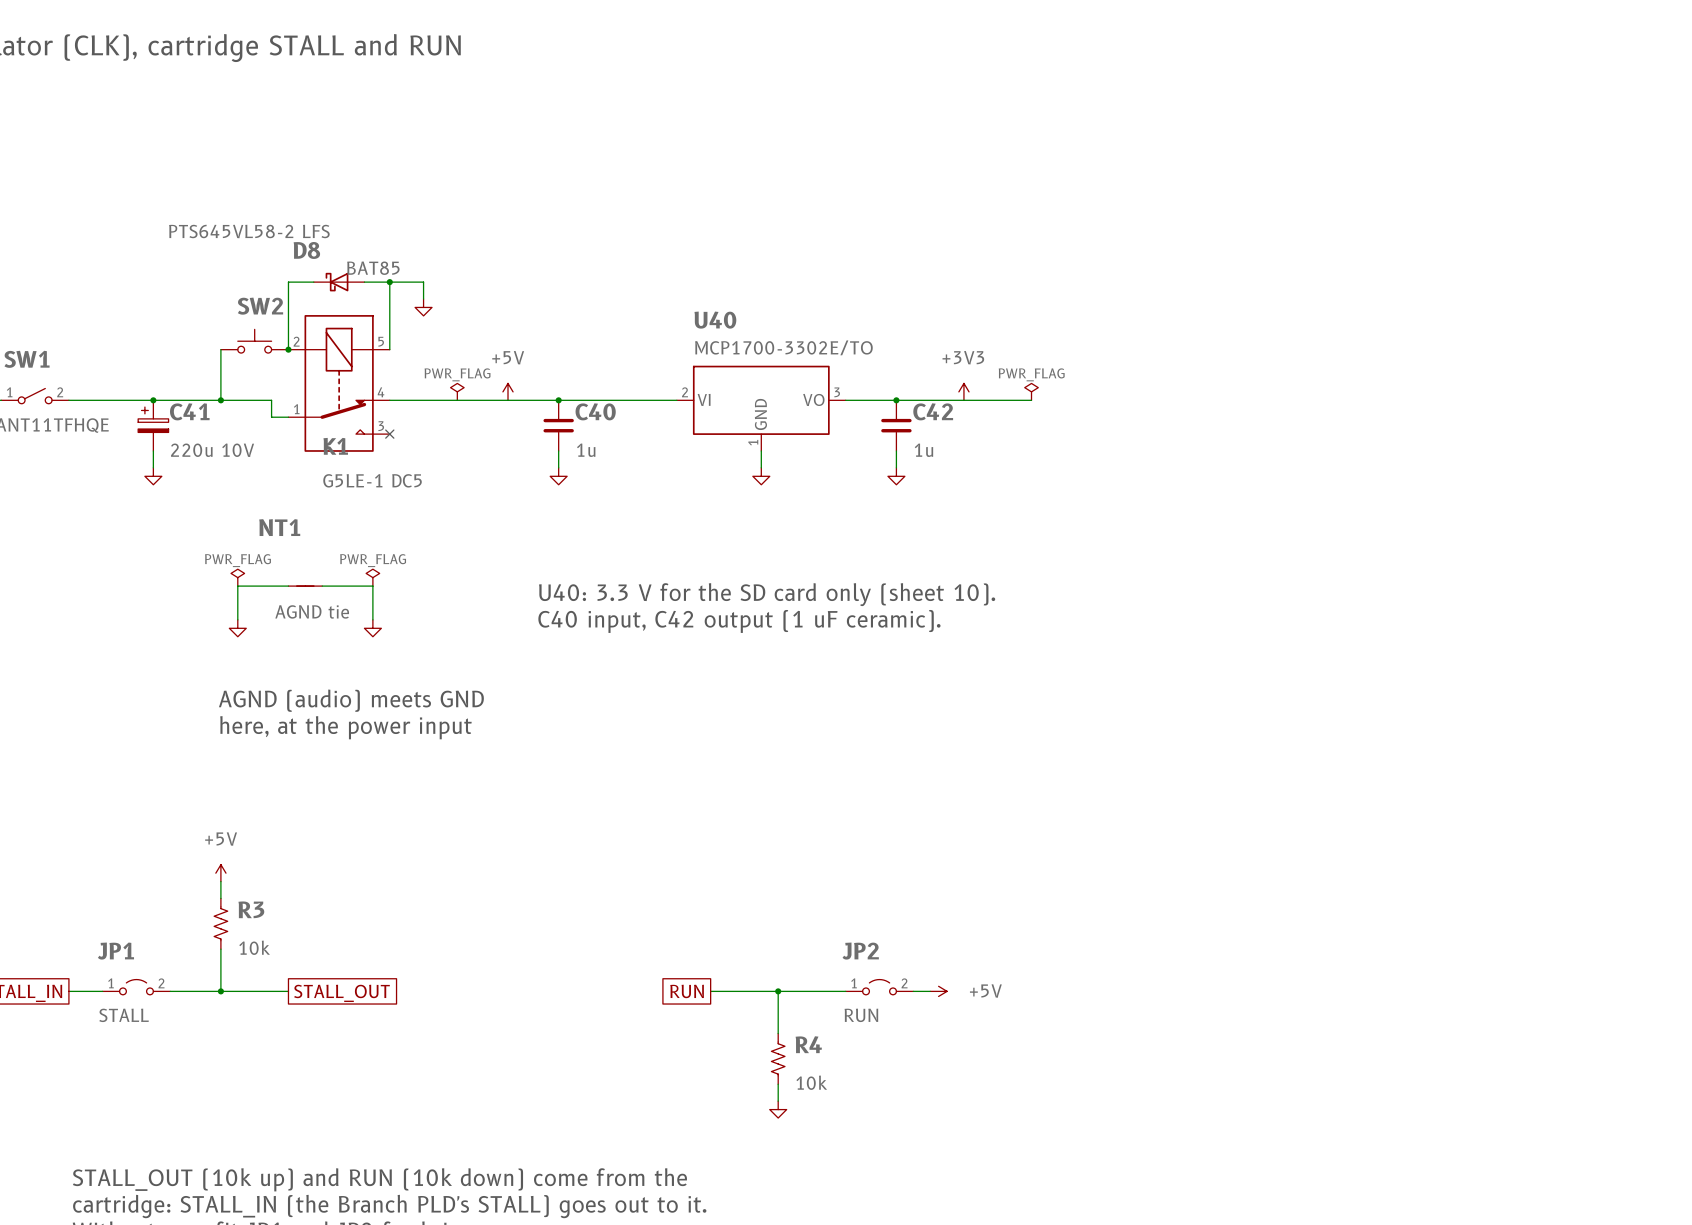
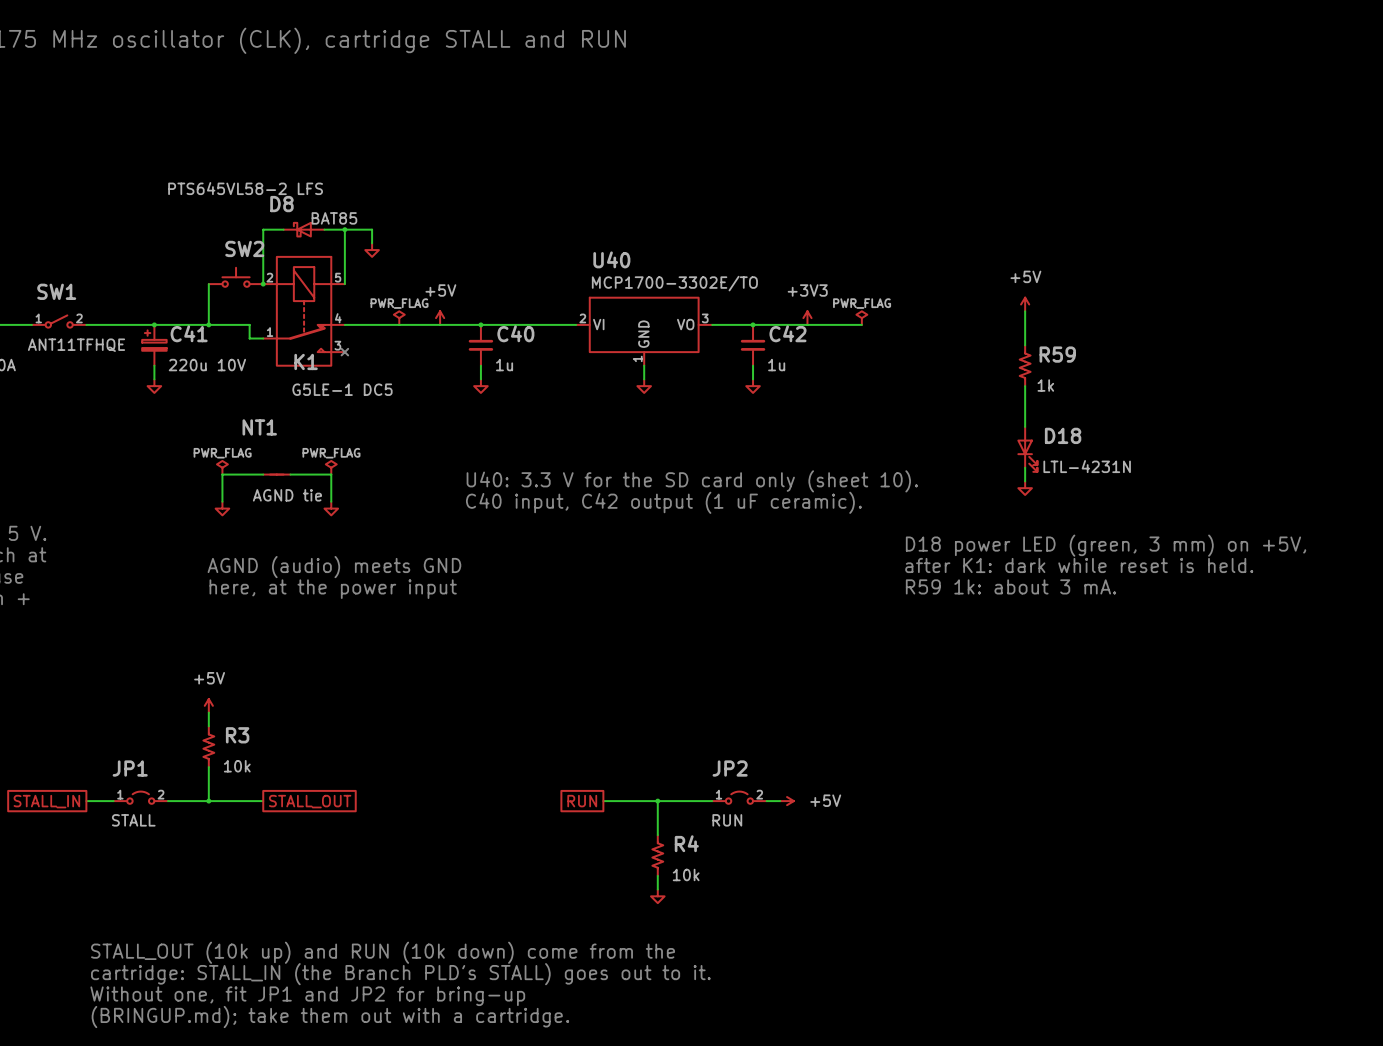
power symbol: none -> +5V (1025, 304)
wire: none -> (1025, 311) (1025, 345)
R59: none -> 1k (1025, 365)
wire: none -> (1025, 386) (1025, 426)
D18: none -> LTL-4231N (1027, 449)
wire: none -> (1025, 467) (1025, 481)
power symbol: none -> (1025, 488)
text: none -> D18 power LED (green, 3 mm) on +5V, (1106, 545)
text: none -> after K1: dark while reset is held. (1079, 565)
text: none -> R59 1k: about 3 mA. (1011, 586)

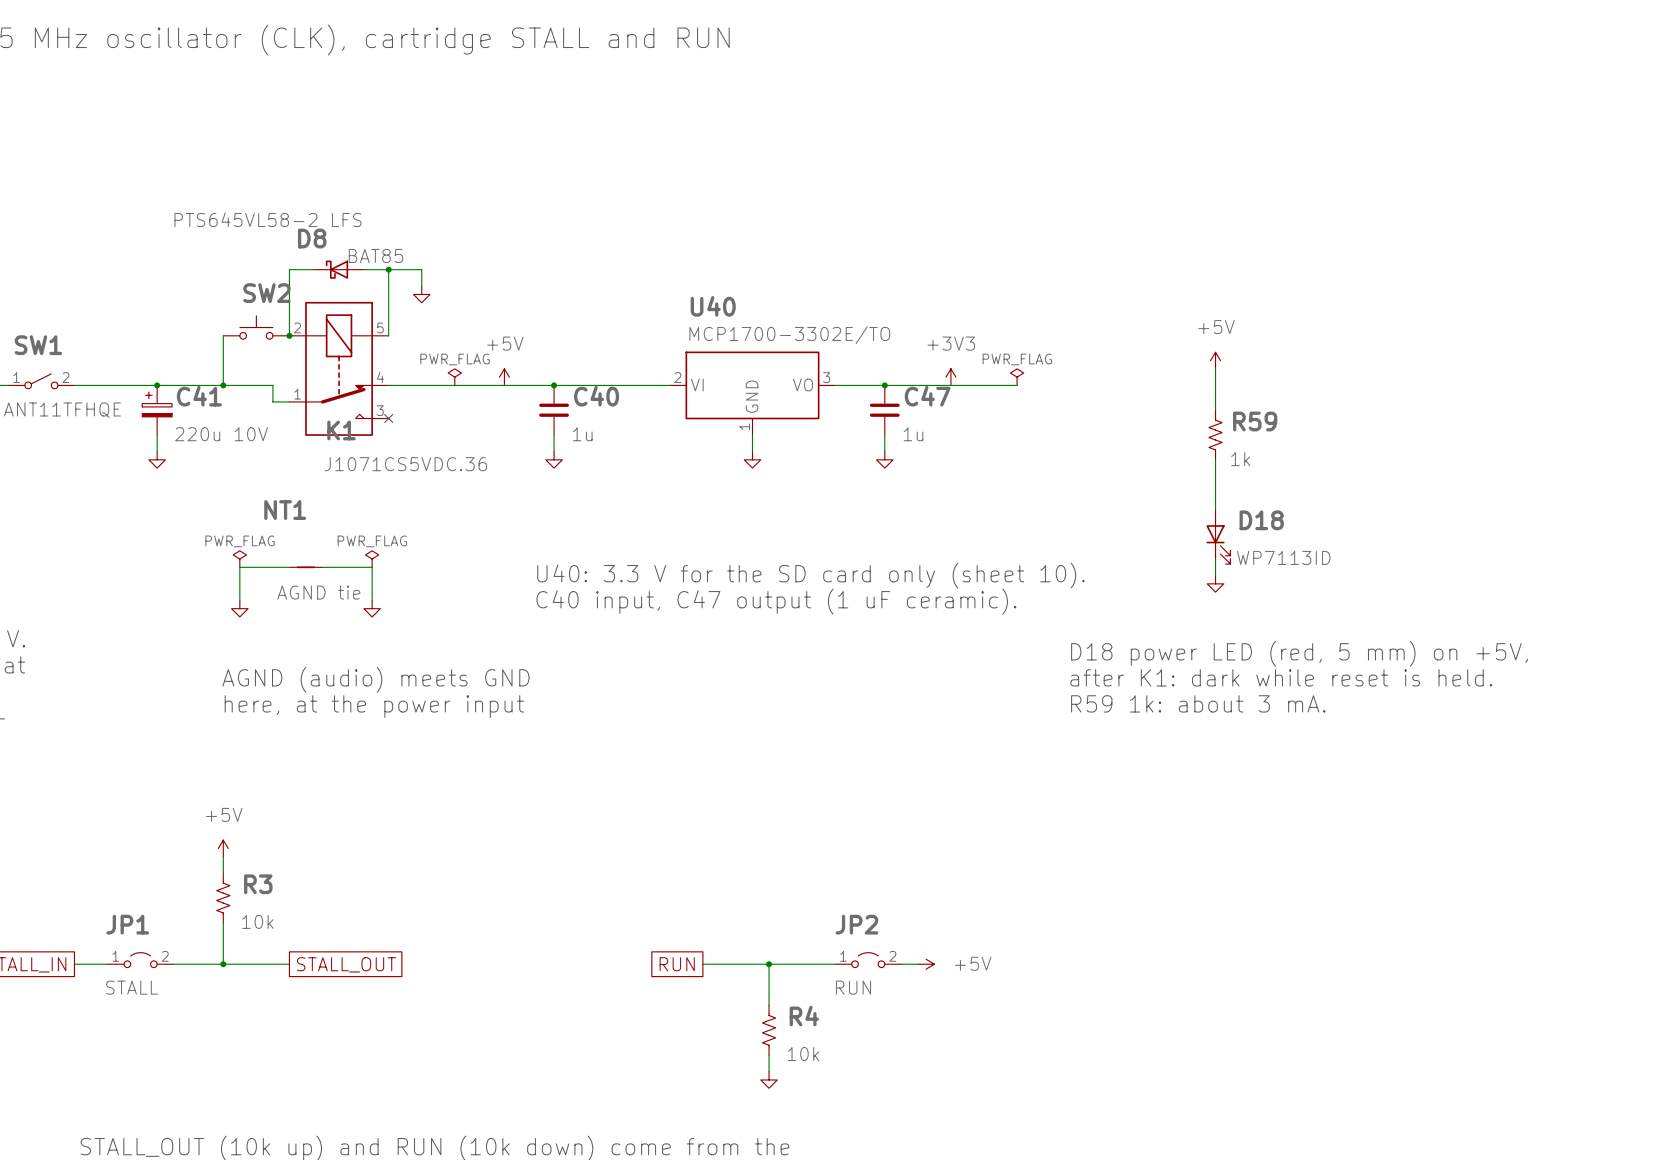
C42 name: C42 (787, 333) -> C47 (927, 396)
K1 value: G5LE-1 DC5 (342, 389) -> J1071CS5VDC.36 (405, 464)
D18 value: LTL-4231N (1087, 466) -> WP7113ID (1283, 557)
text: C40 input, C42 output (1 uF ceramic). (663, 502) -> C40 input, C47 output (1 uF ceramic). (776, 601)
text: D18 power LED (green, 3 mm) on +5V, (1106, 545) -> D18 power LED (red, 5 mm) on +5V, (1299, 653)

